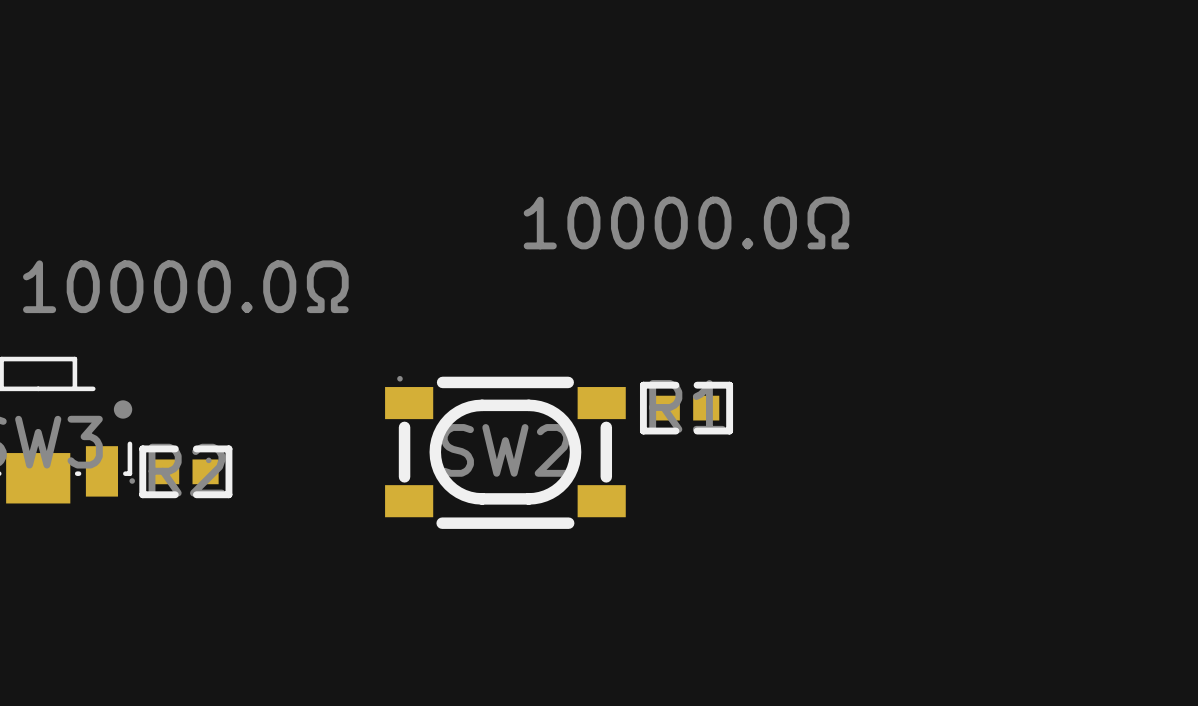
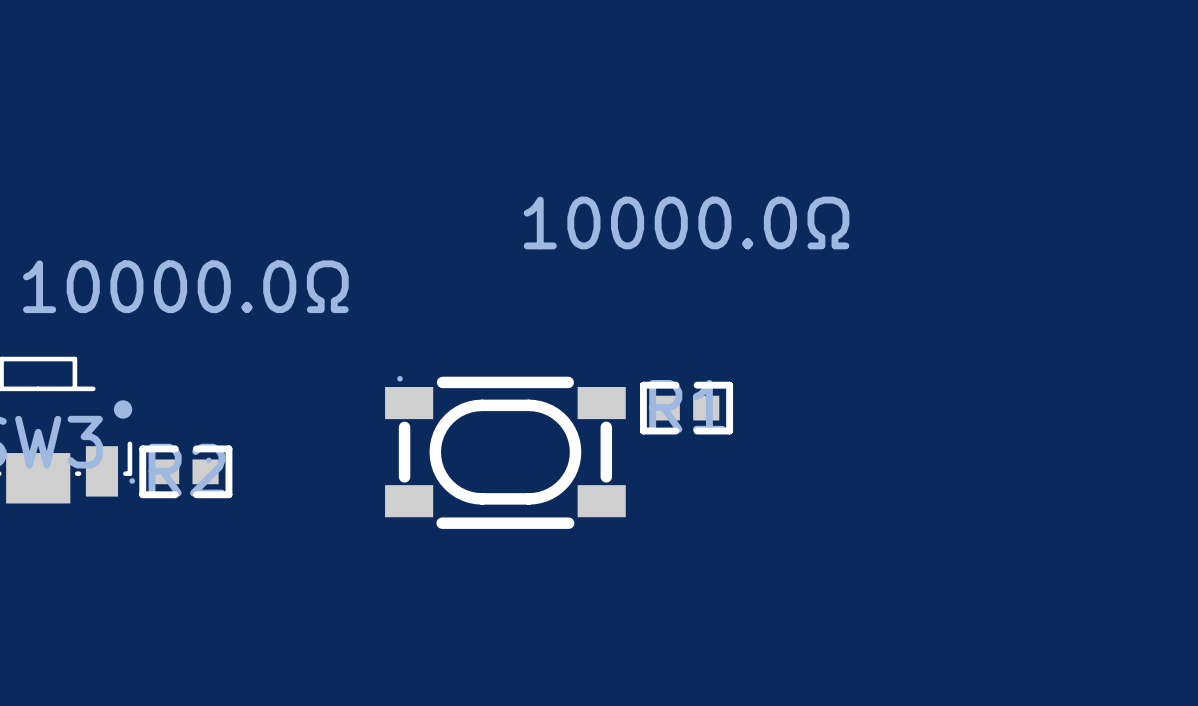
SW2 name: SW2 (505, 450) -> none

